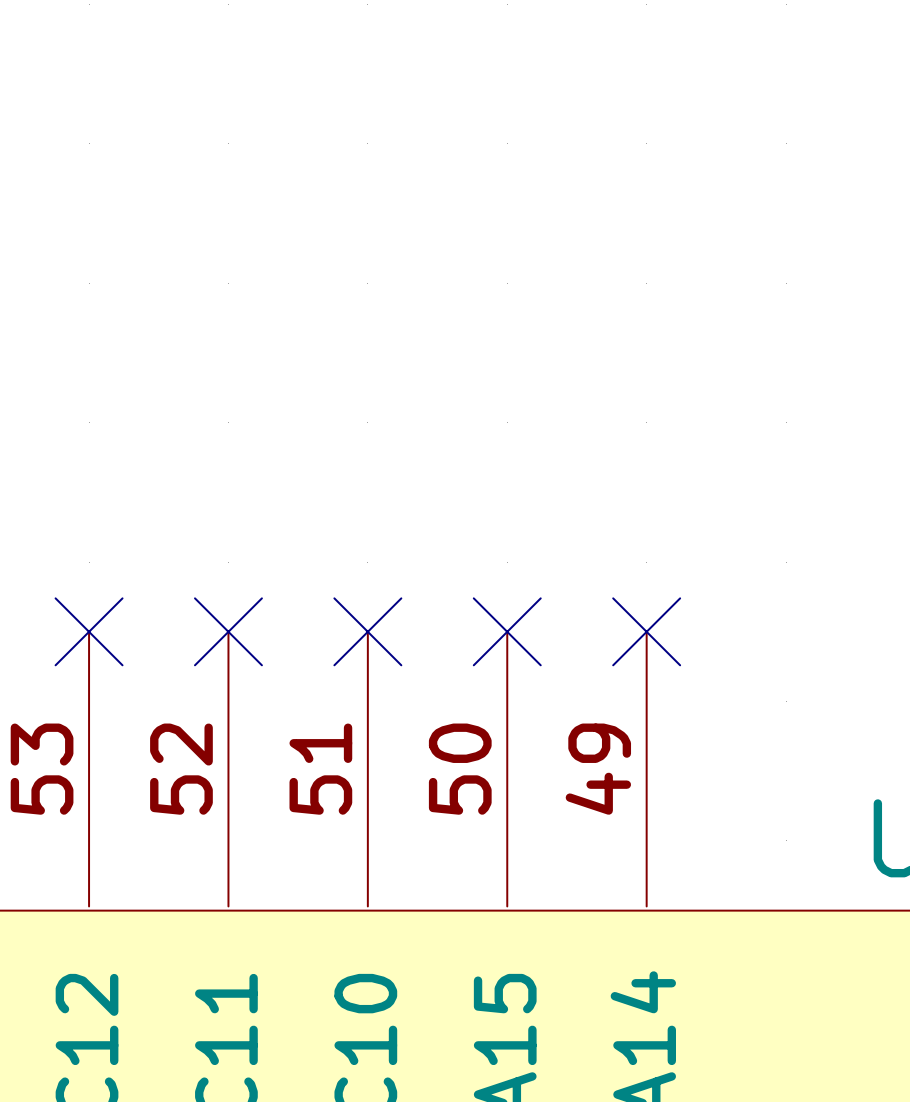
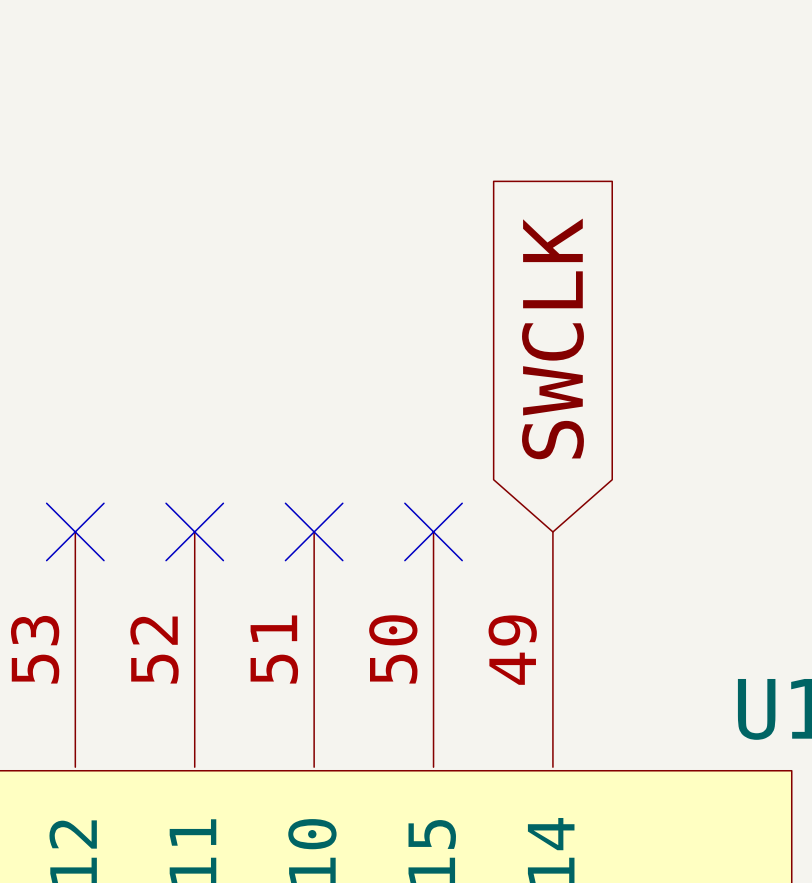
global label: none -> SWCLK (552, 338)
no-connect mark: (646, 631) -> none

